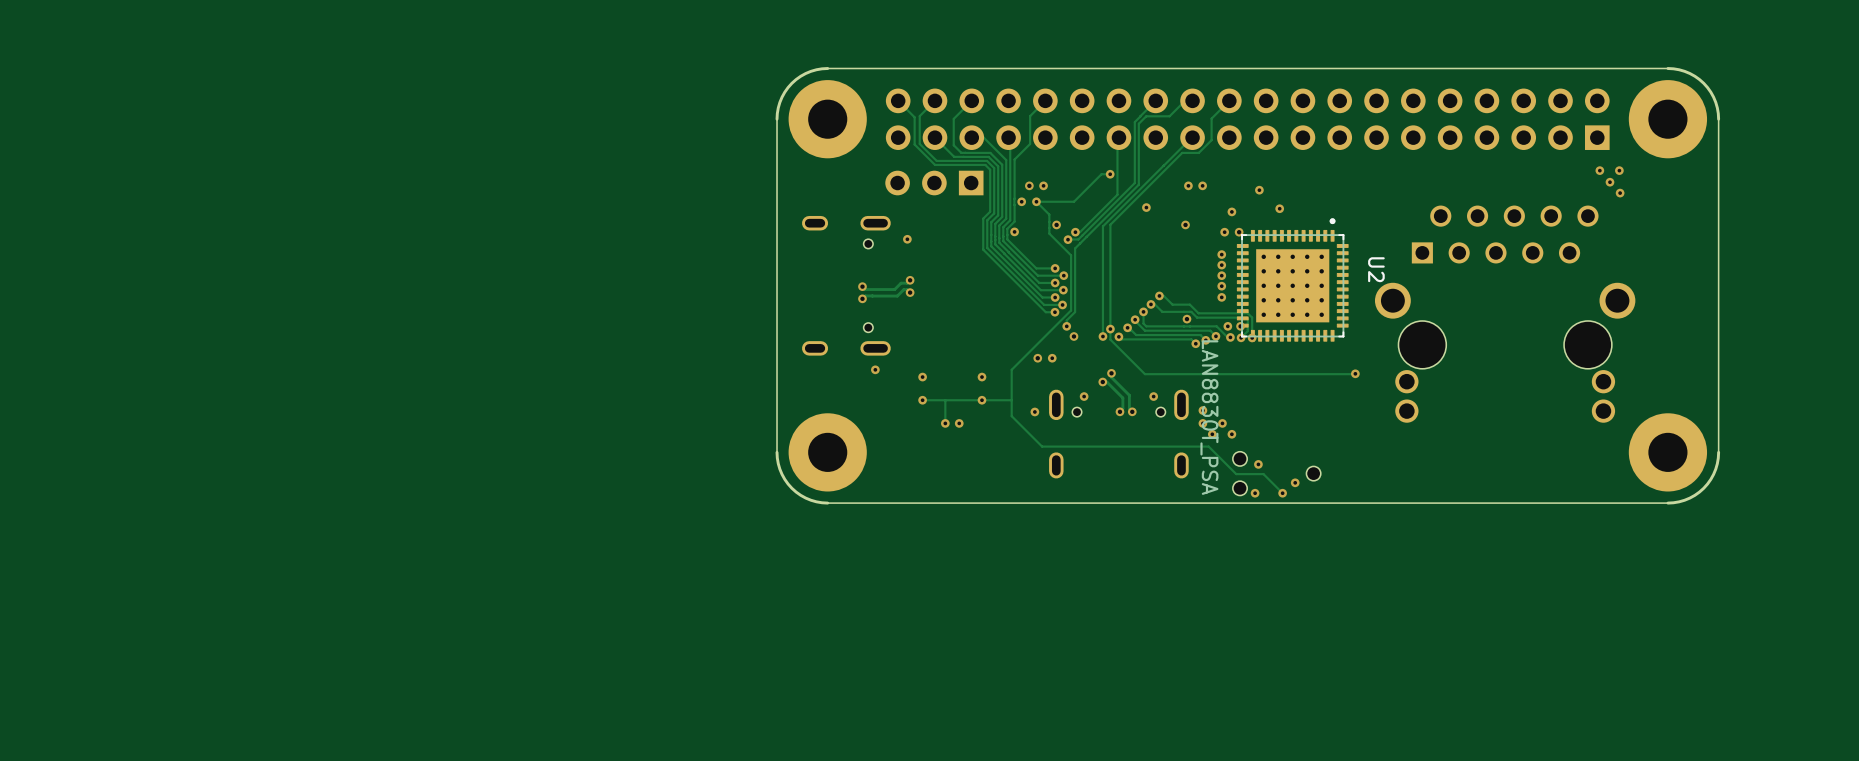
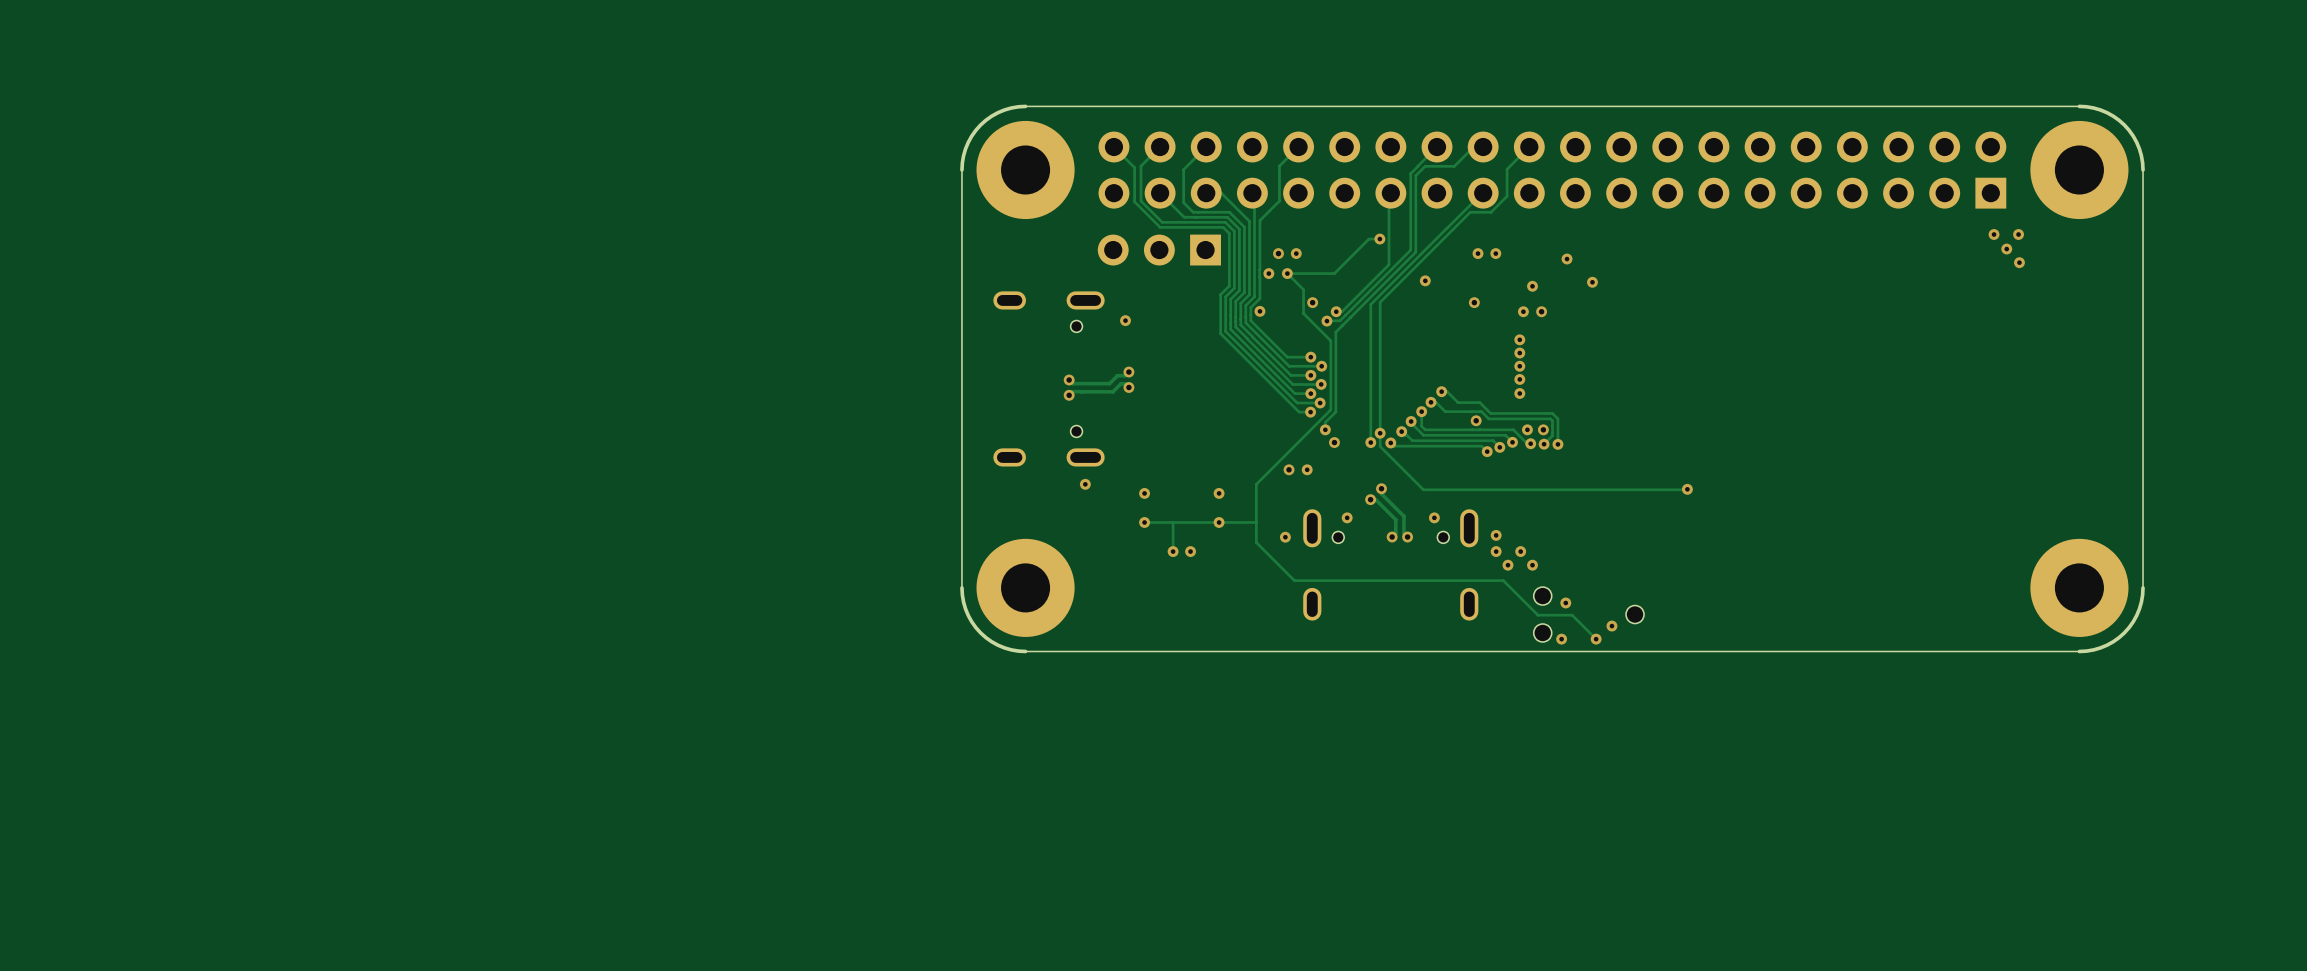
U2: LAN8830T_PSA (1292, 279) -> none
part: (1505, 314) -> none

